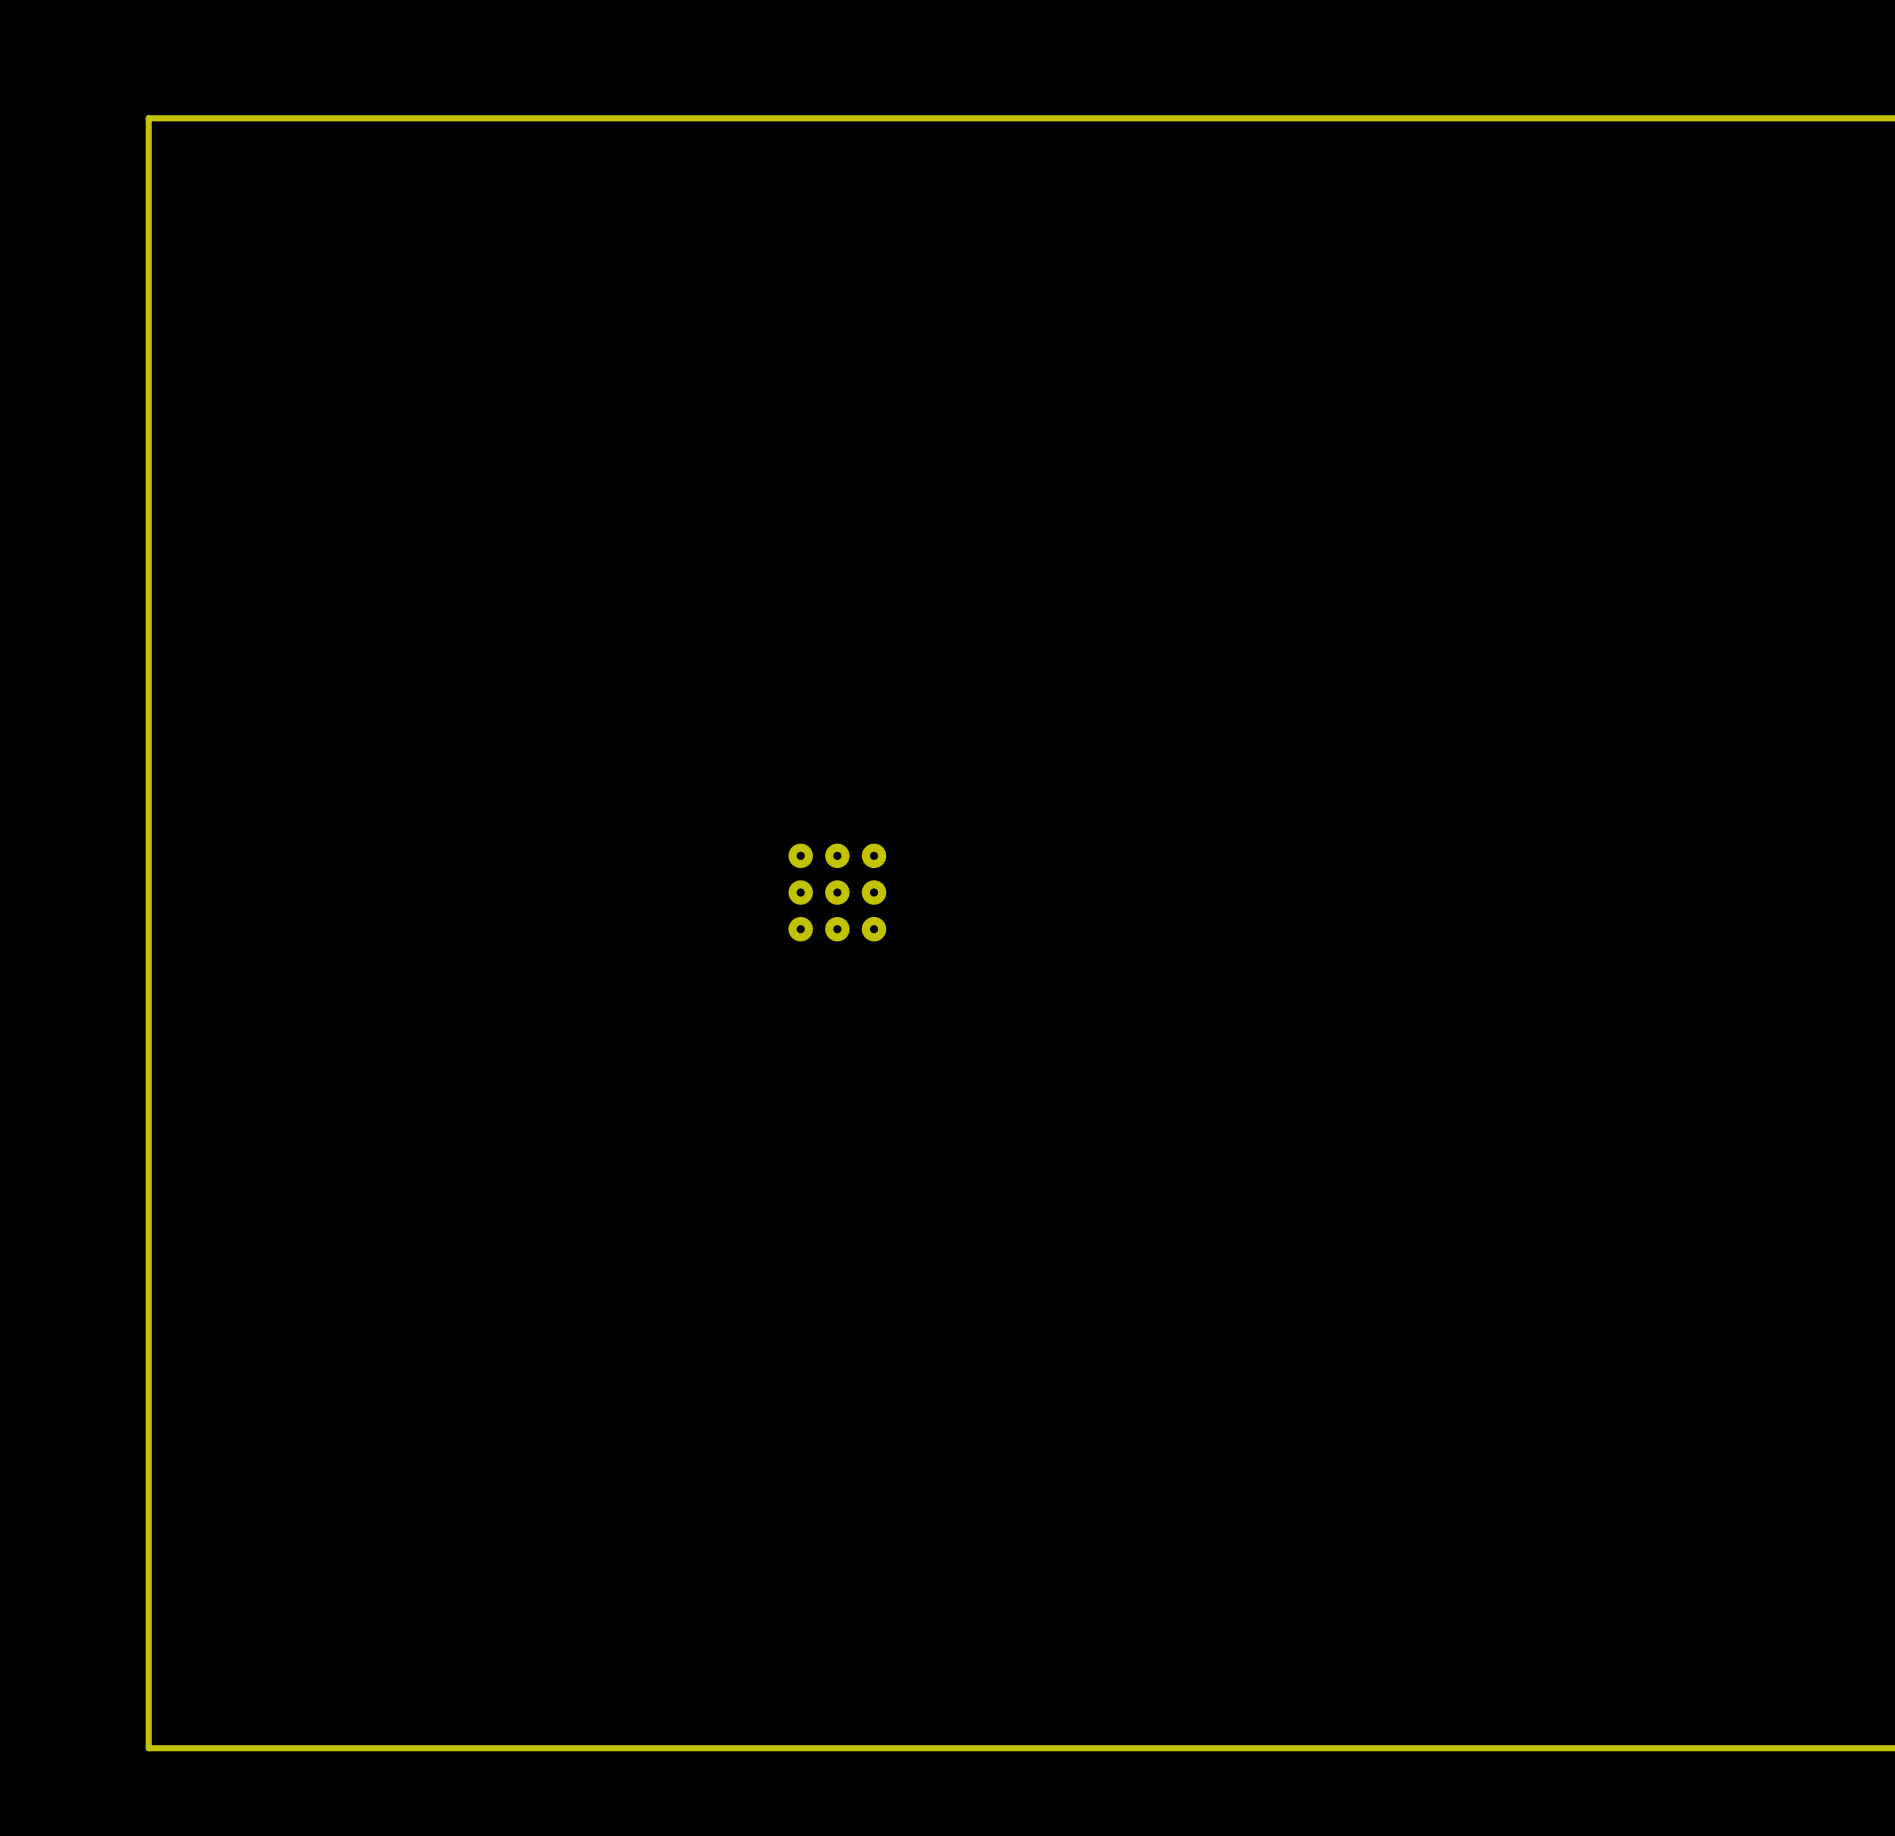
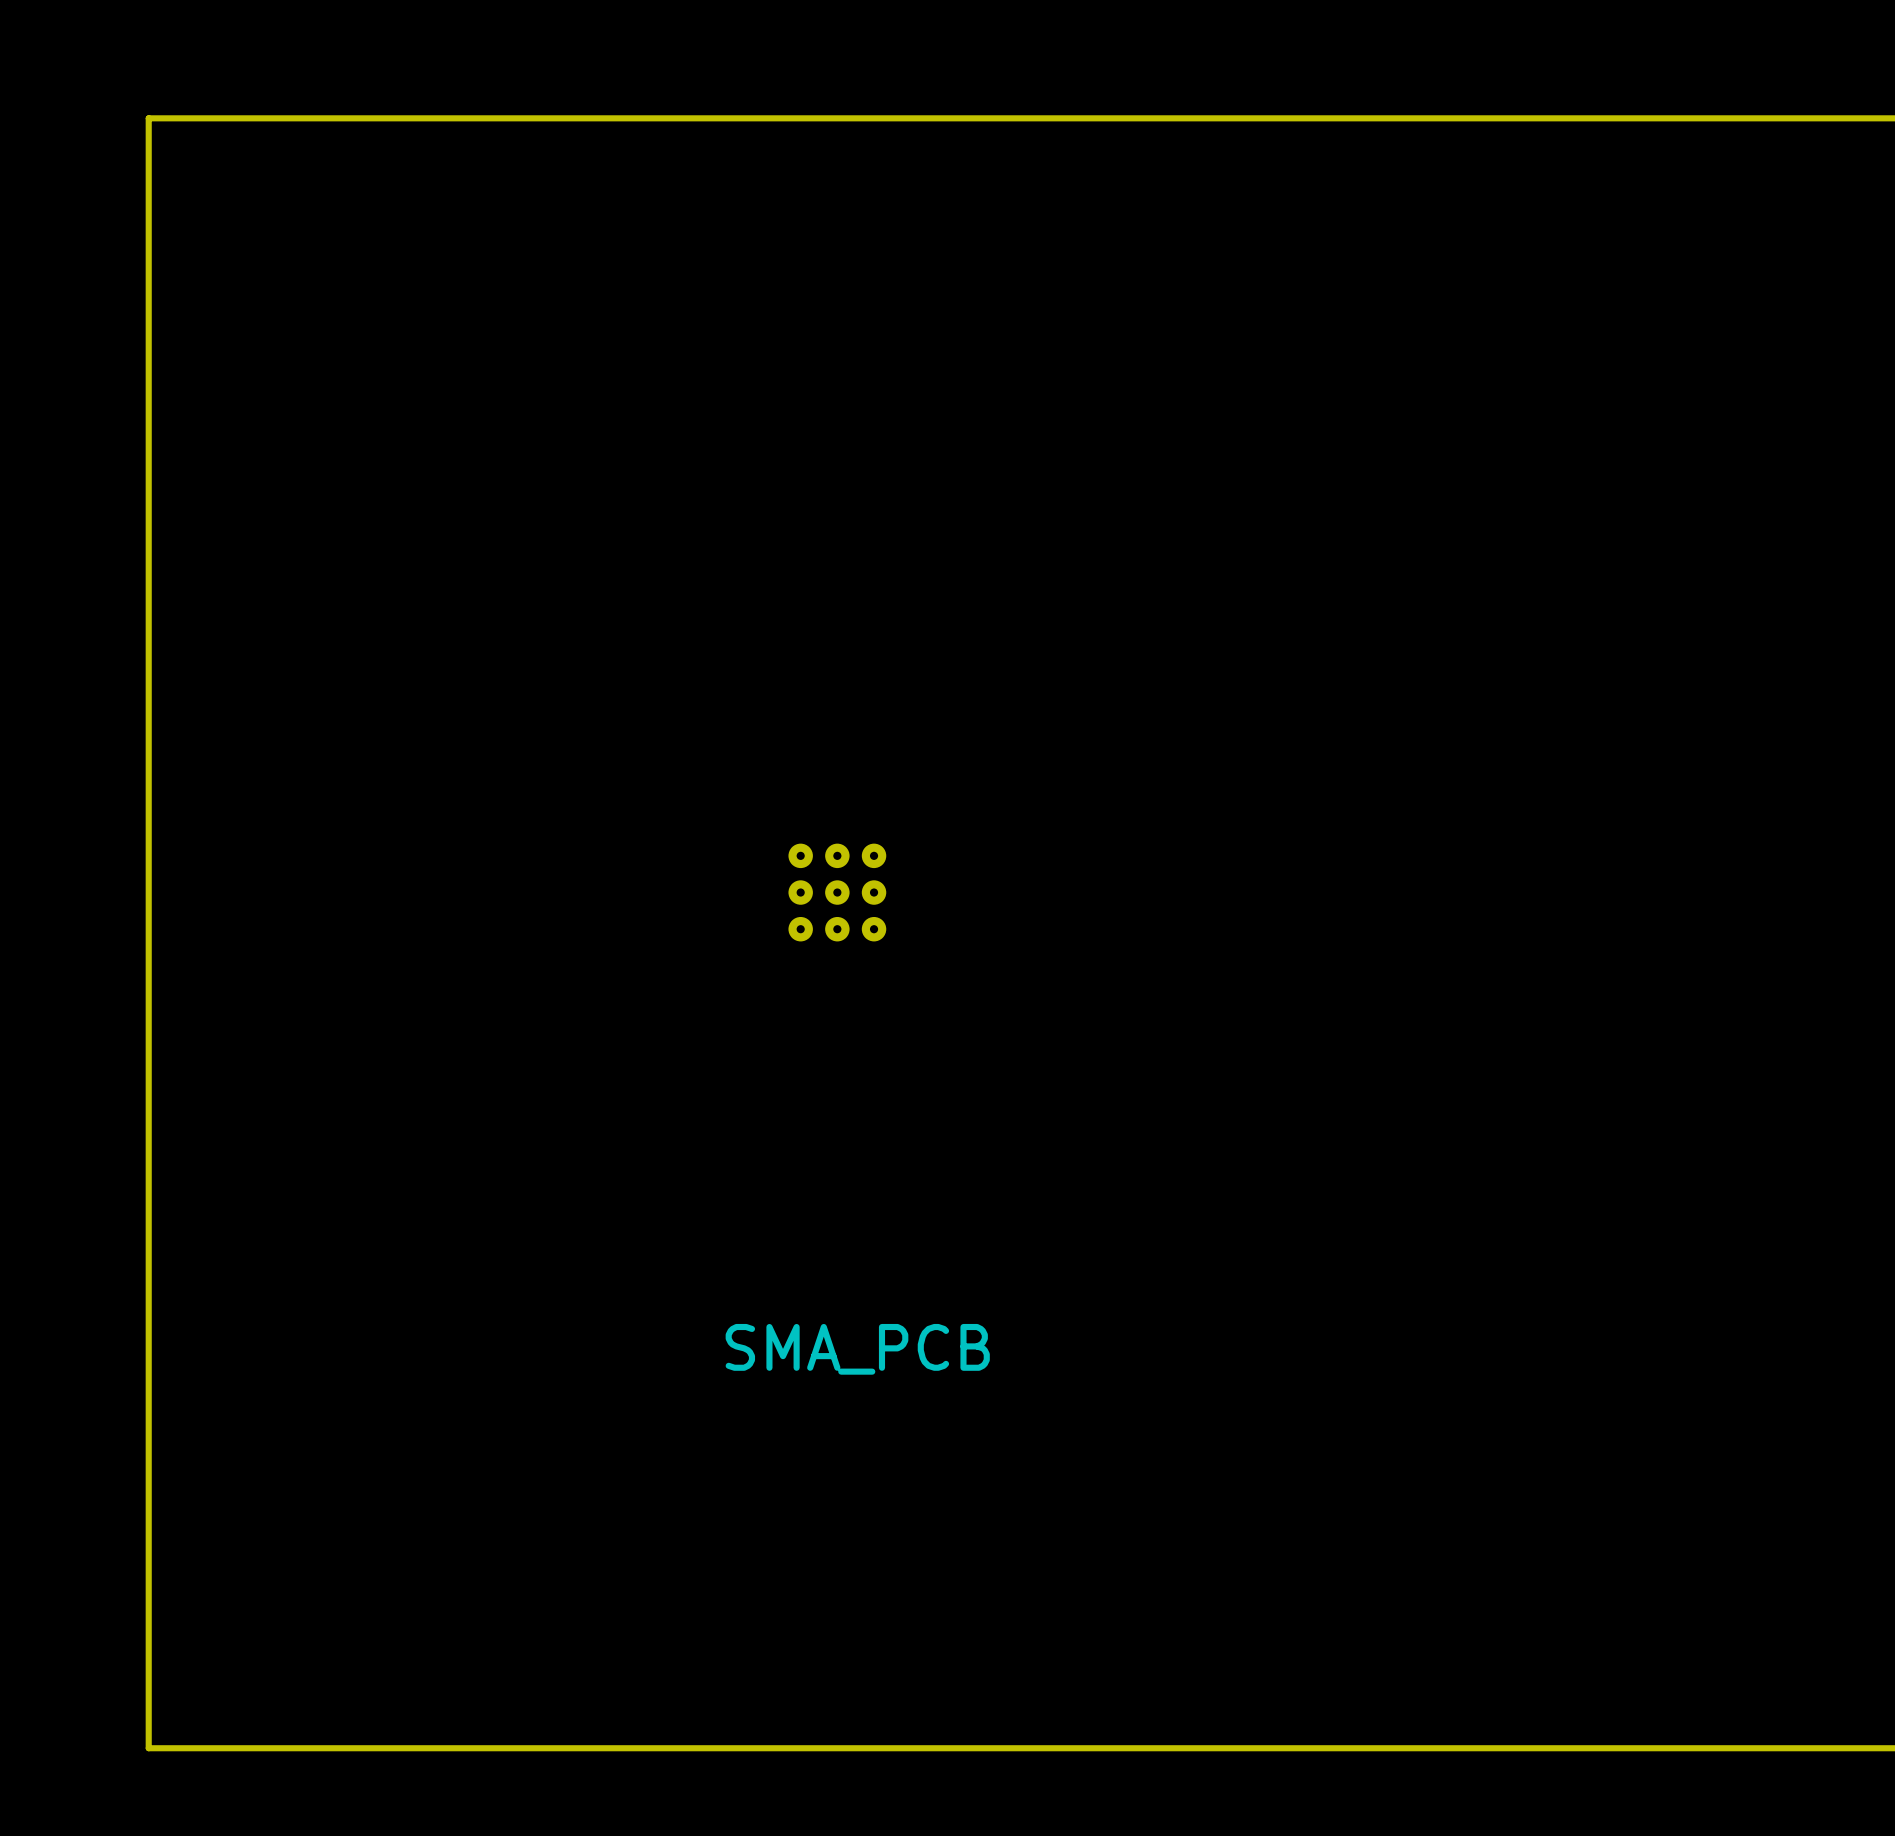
part: none -> SMA_PCB (857, 1349)

